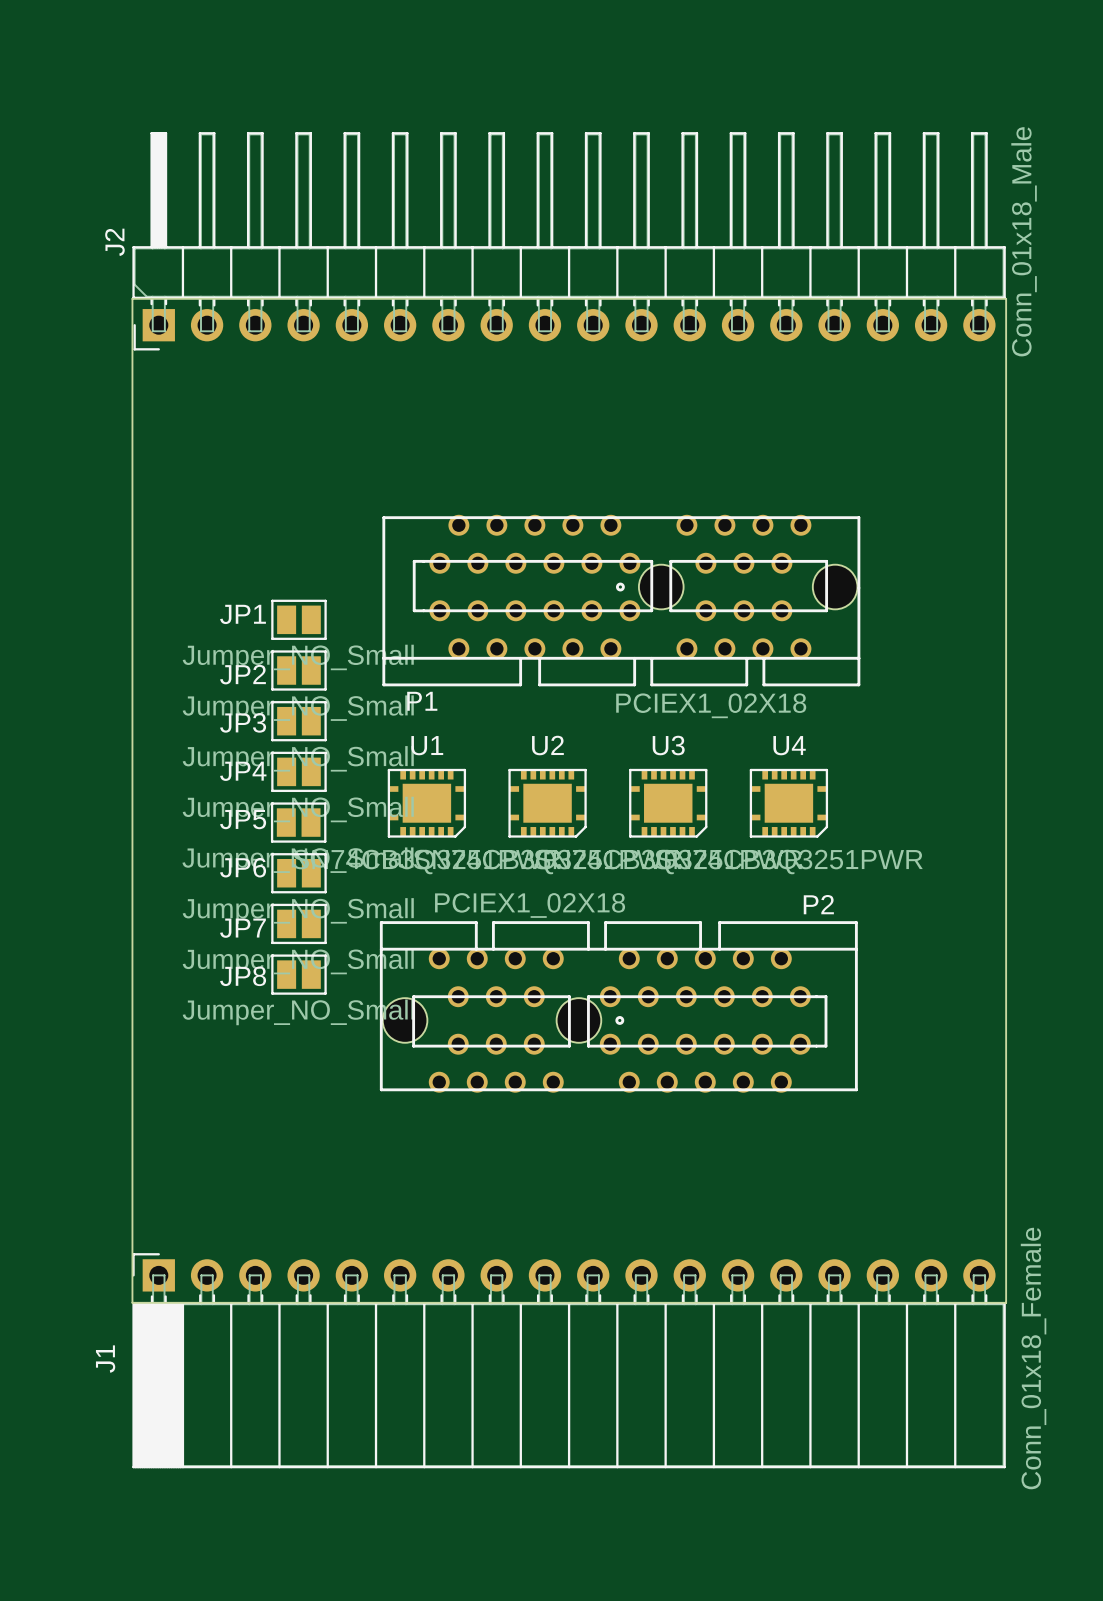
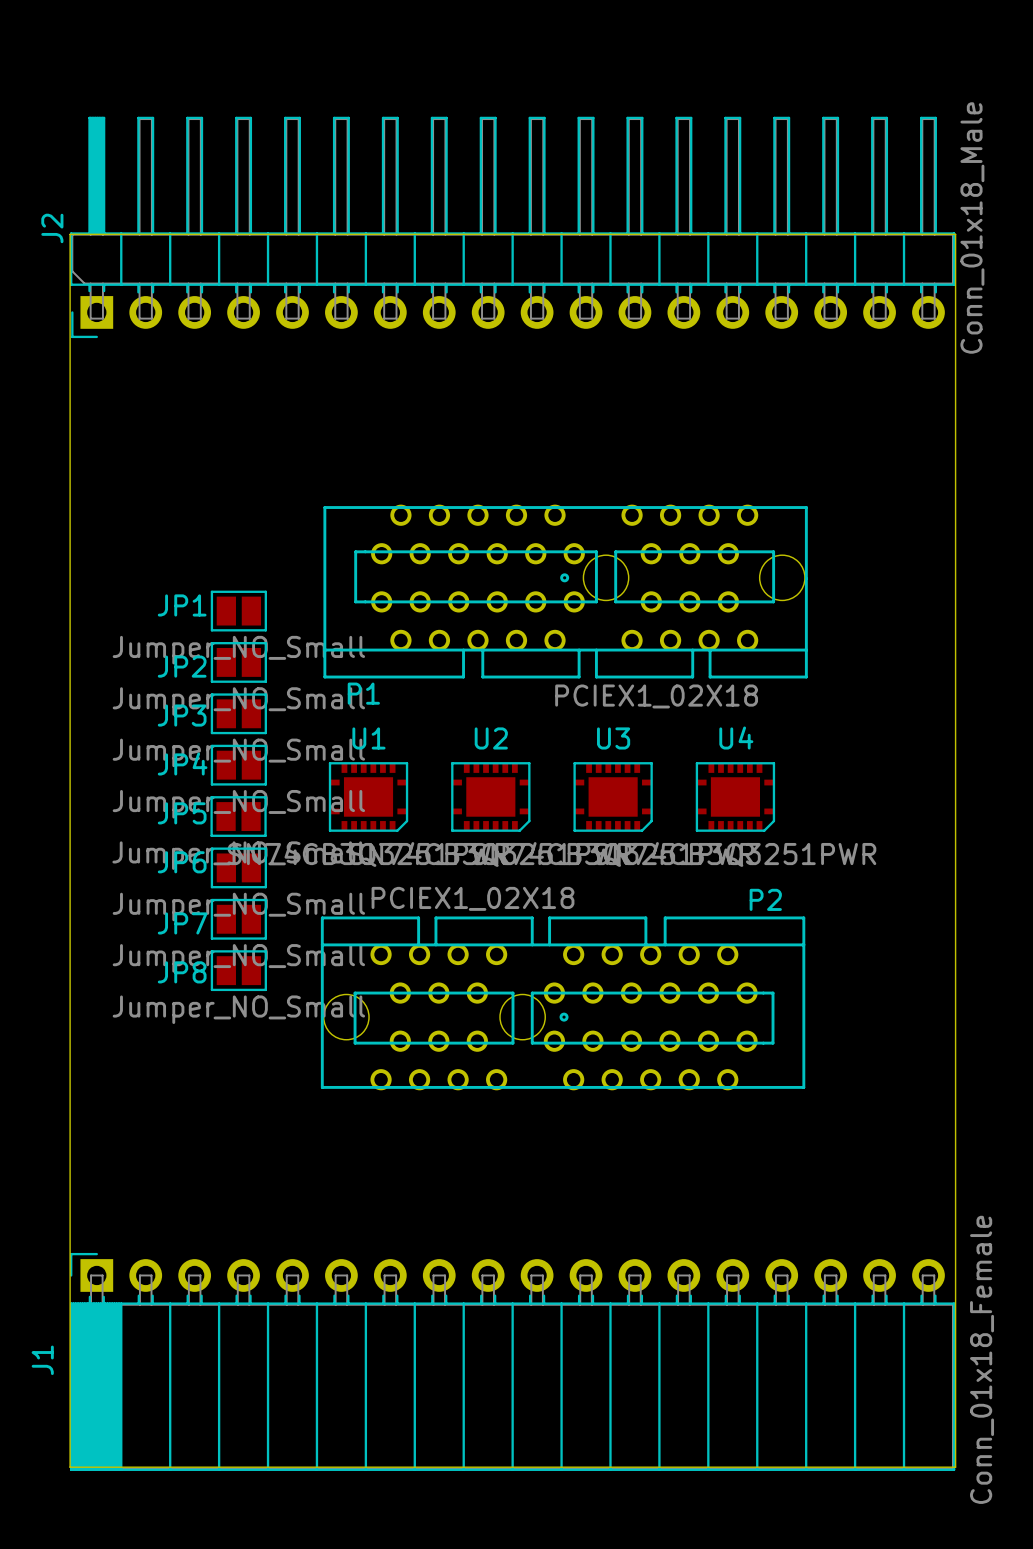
board edge: (132, 298) (1006, 298) -> (70, 285) (70, 234) (955, 234) (955, 285)
board edge: (132, 1302) (1006, 1302) -> (70, 1303) (70, 1467) (955, 1467) (955, 1303)

